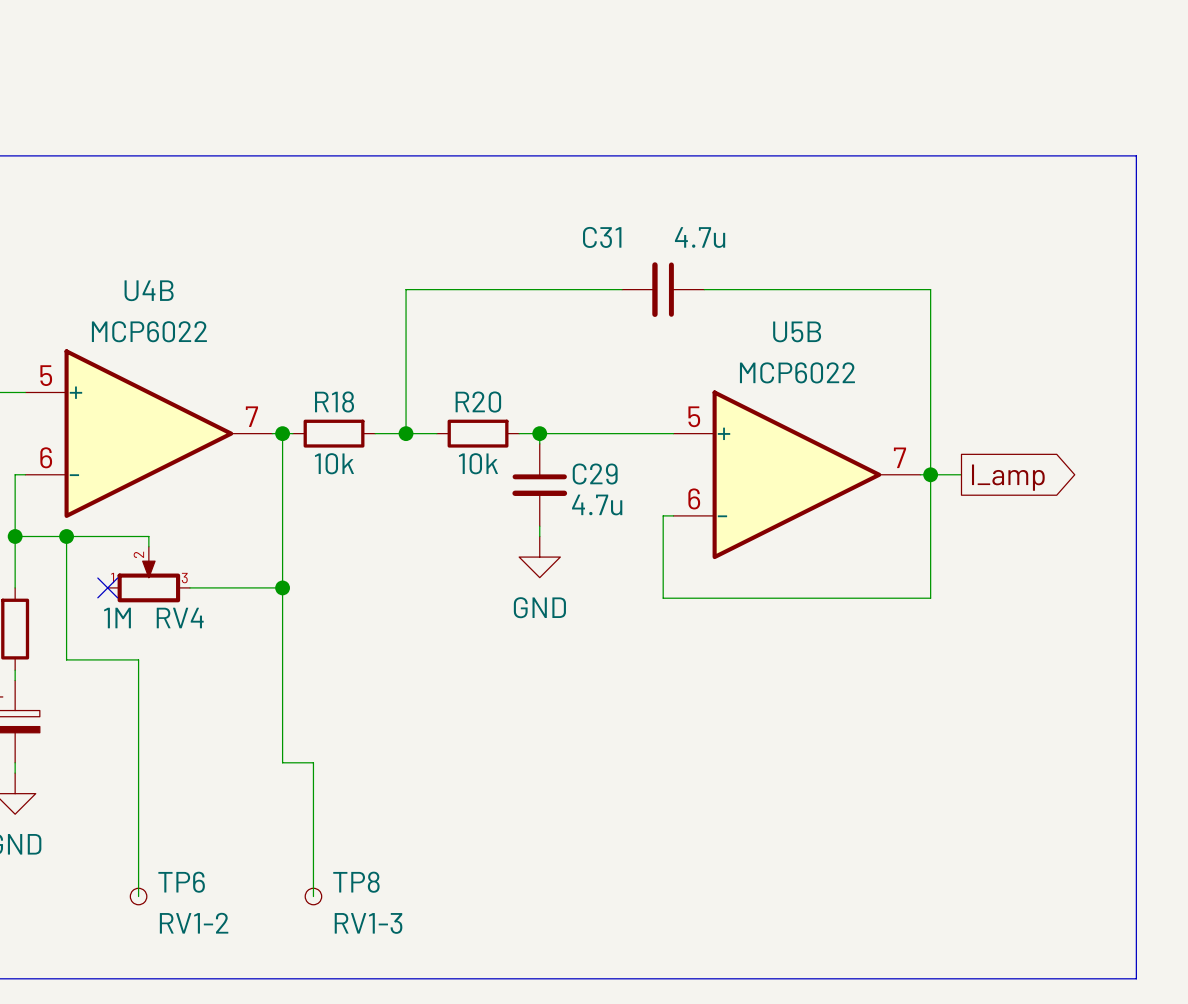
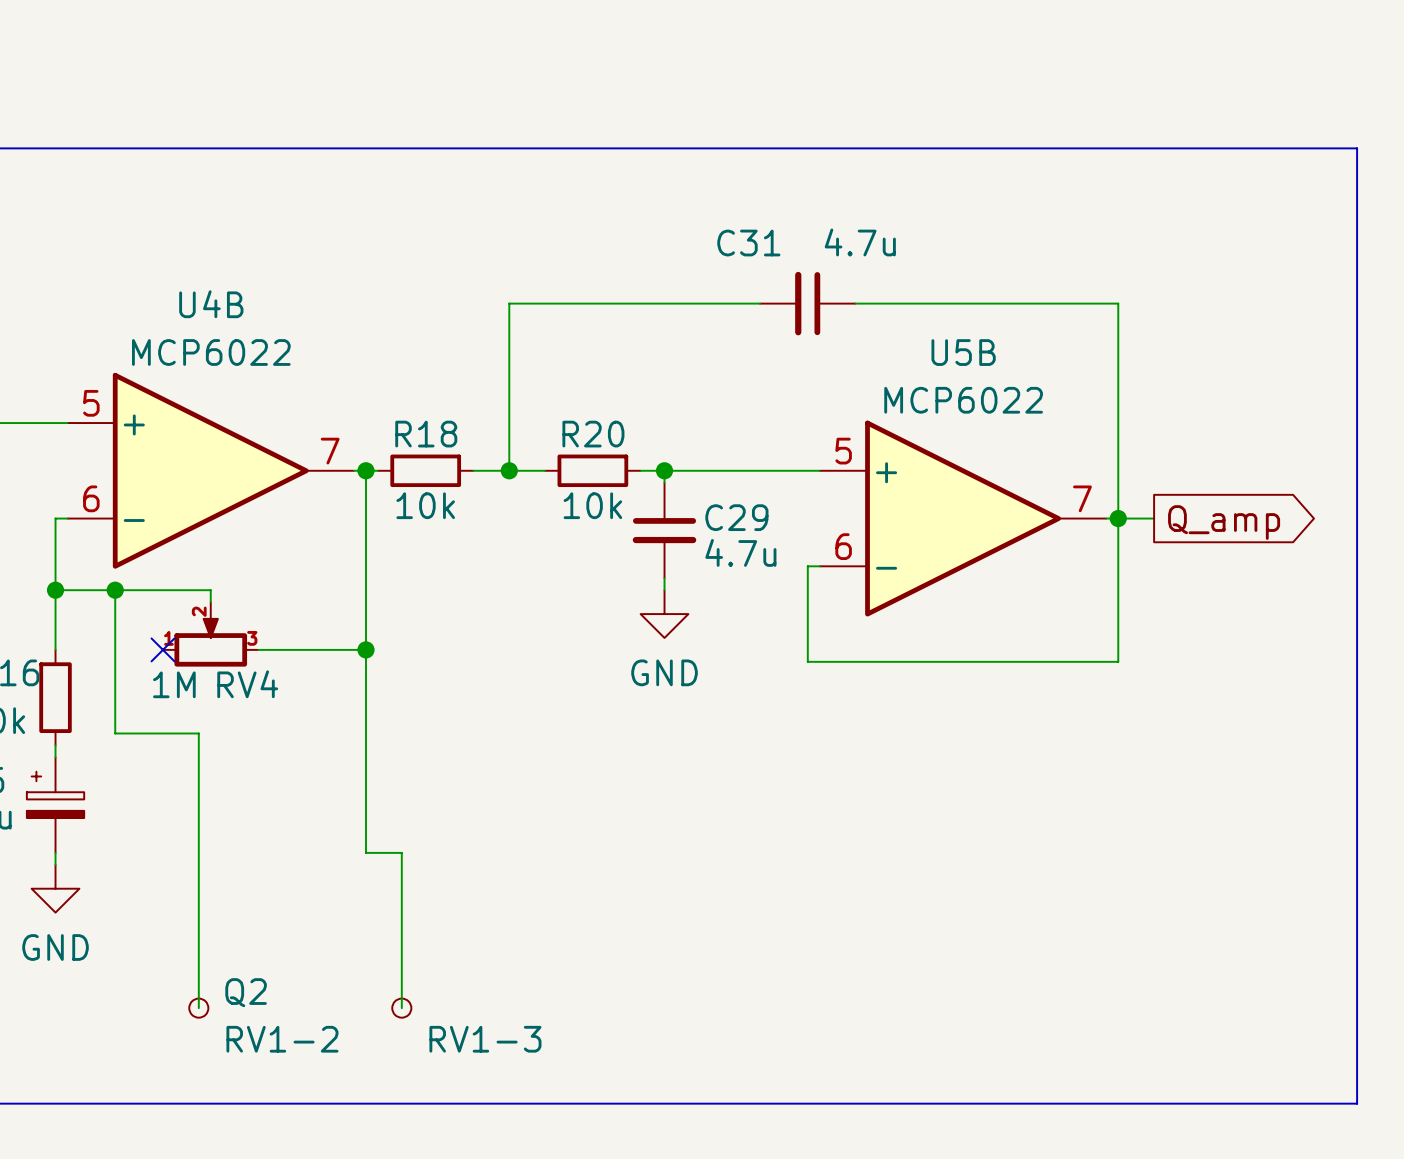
global label: I_amp (1008, 477) -> Q_amp (1224, 522)
TP6 name: TP6 (181, 882) -> Q2 (246, 992)
TP8 name: TP8 (356, 882) -> none

